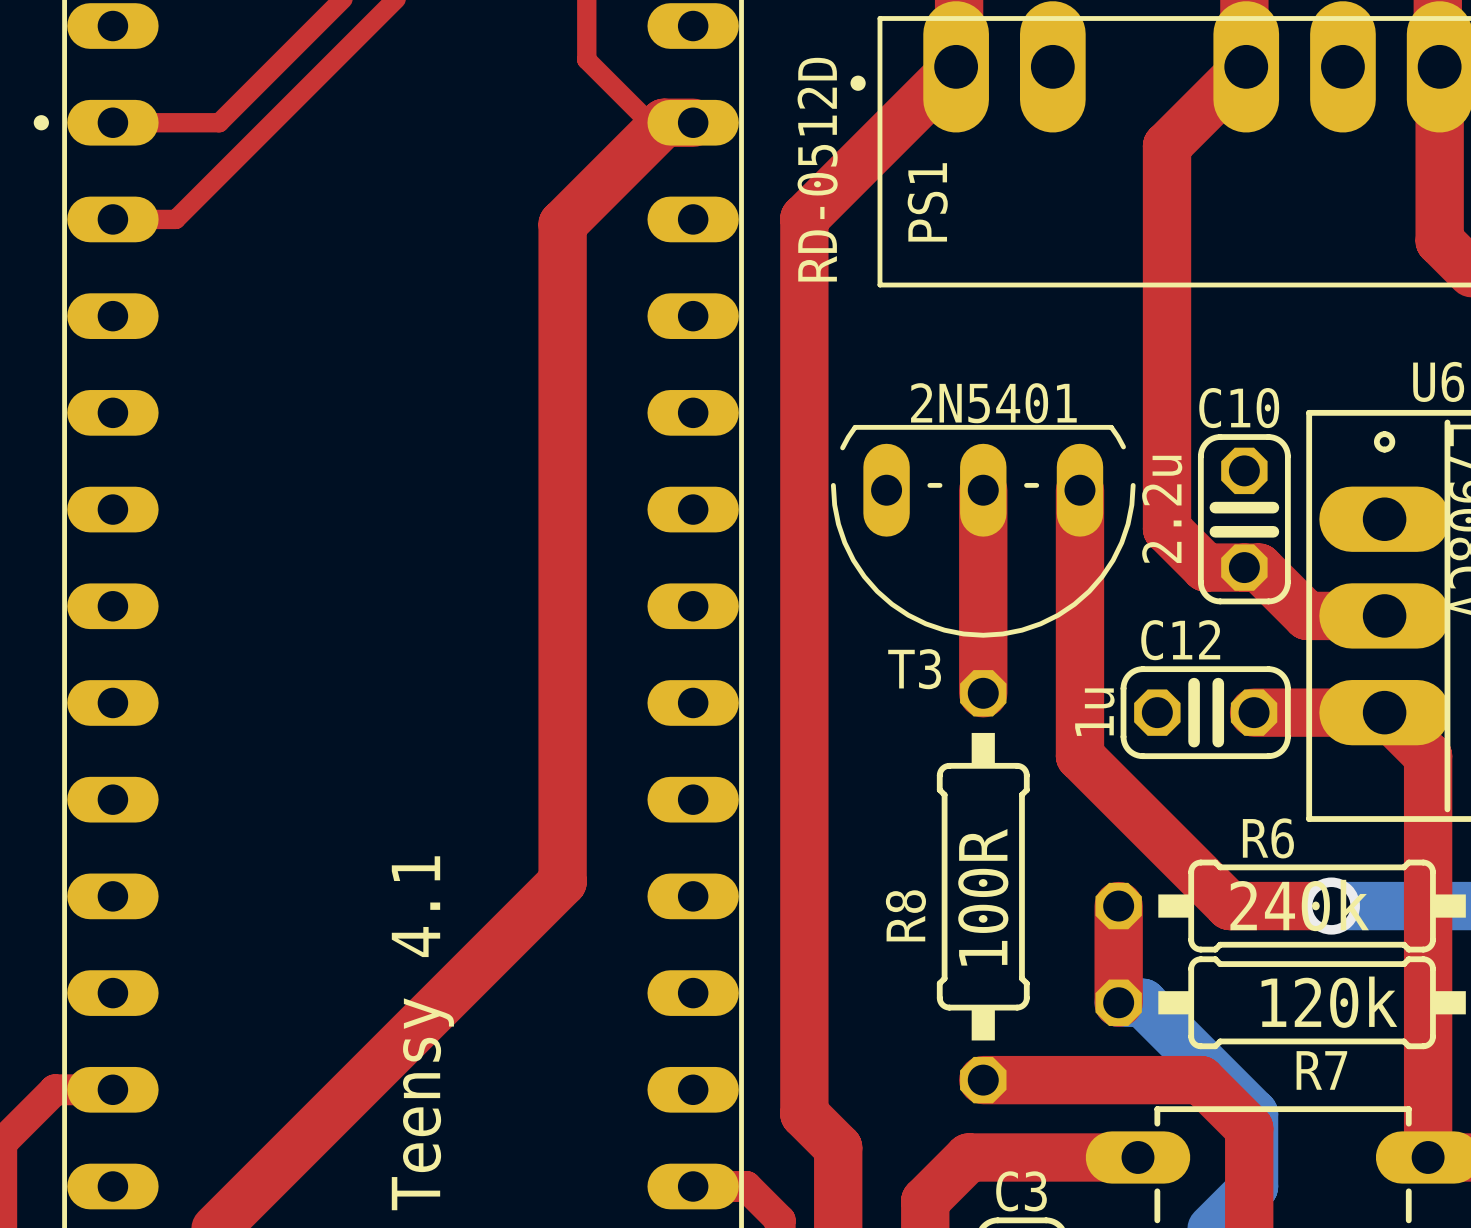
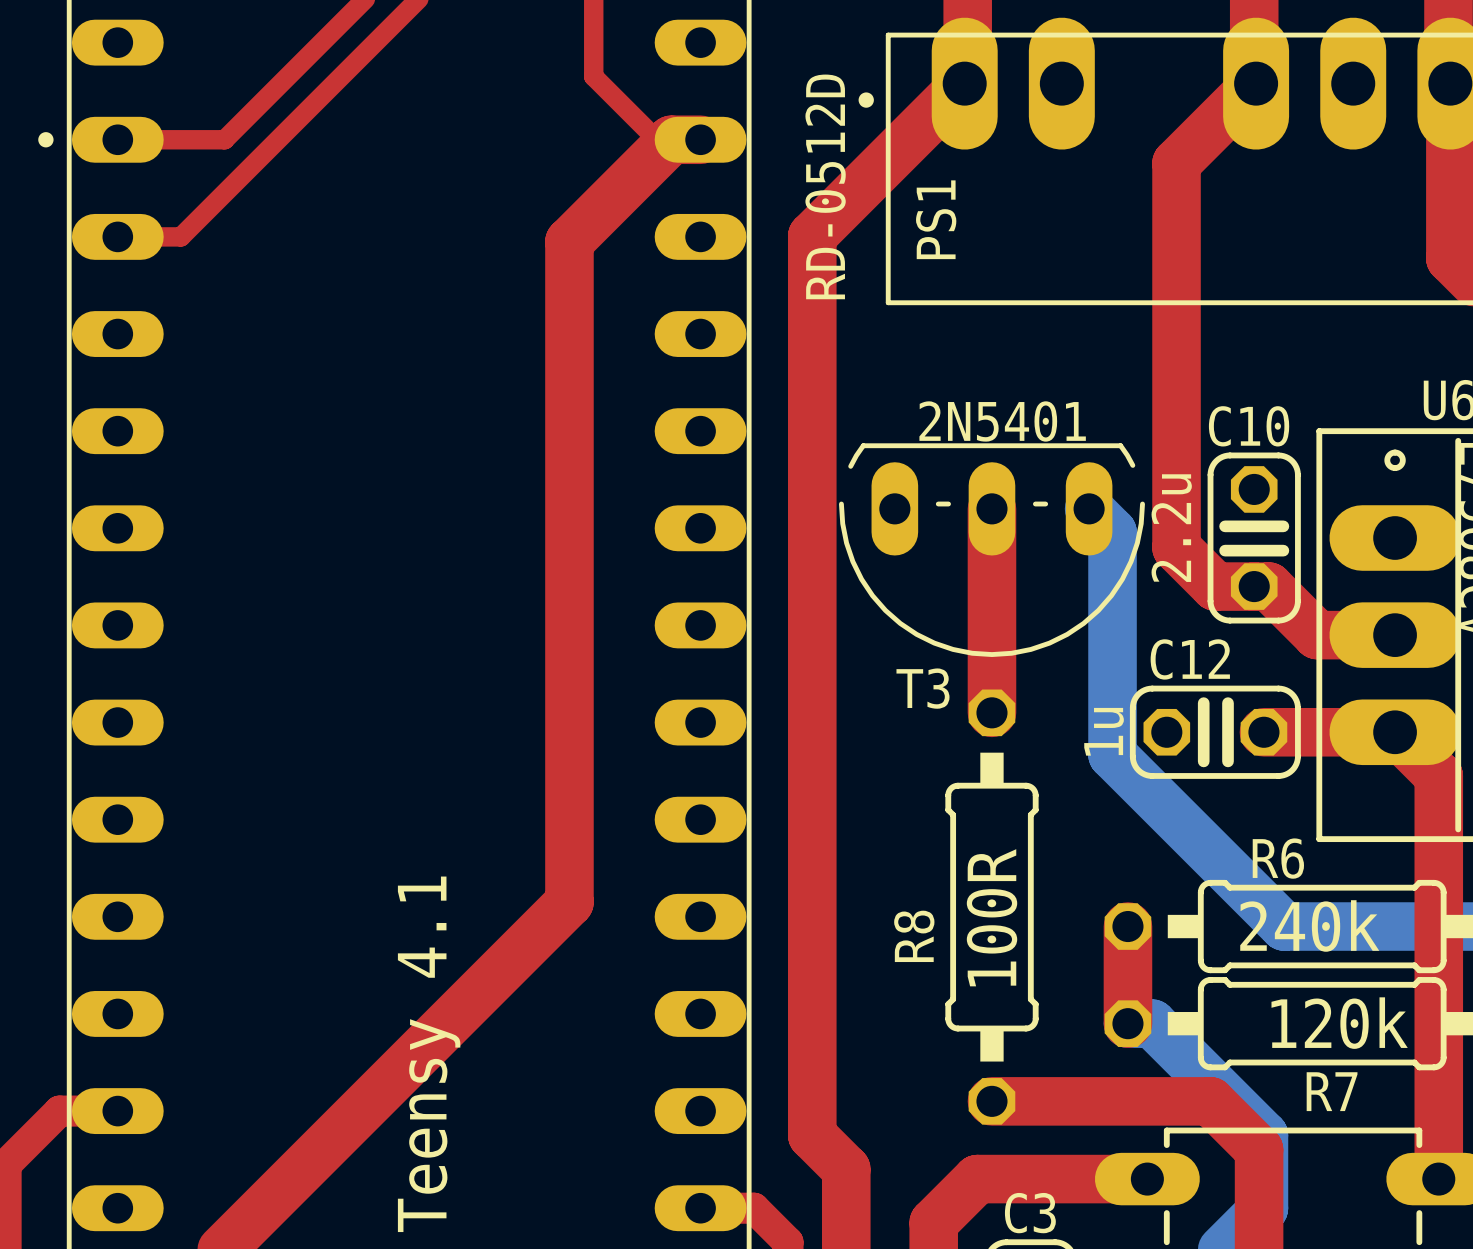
top track: (1079, 490) (1079, 756) (1229, 906) (1331, 906) -> none
bottom track: none -> (1089, 508) (1112, 532) (1112, 754) (1284, 926) (1341, 926)
via: (1331, 906) -> none

